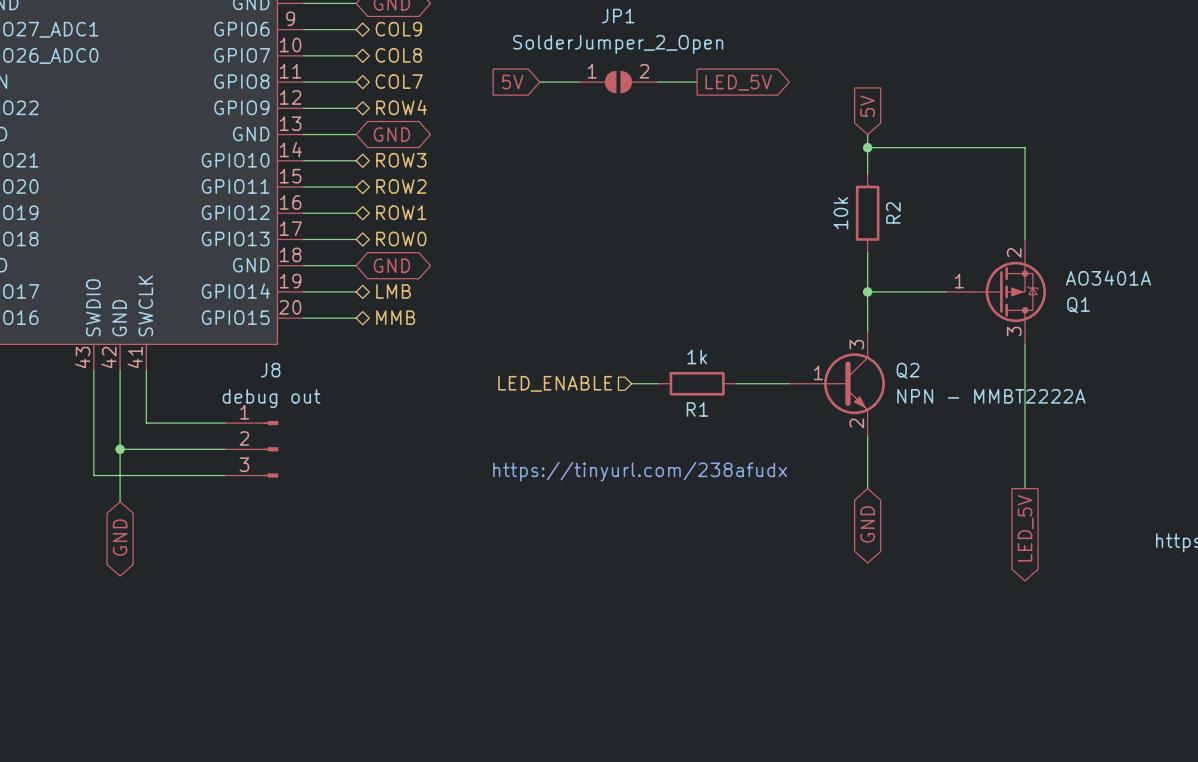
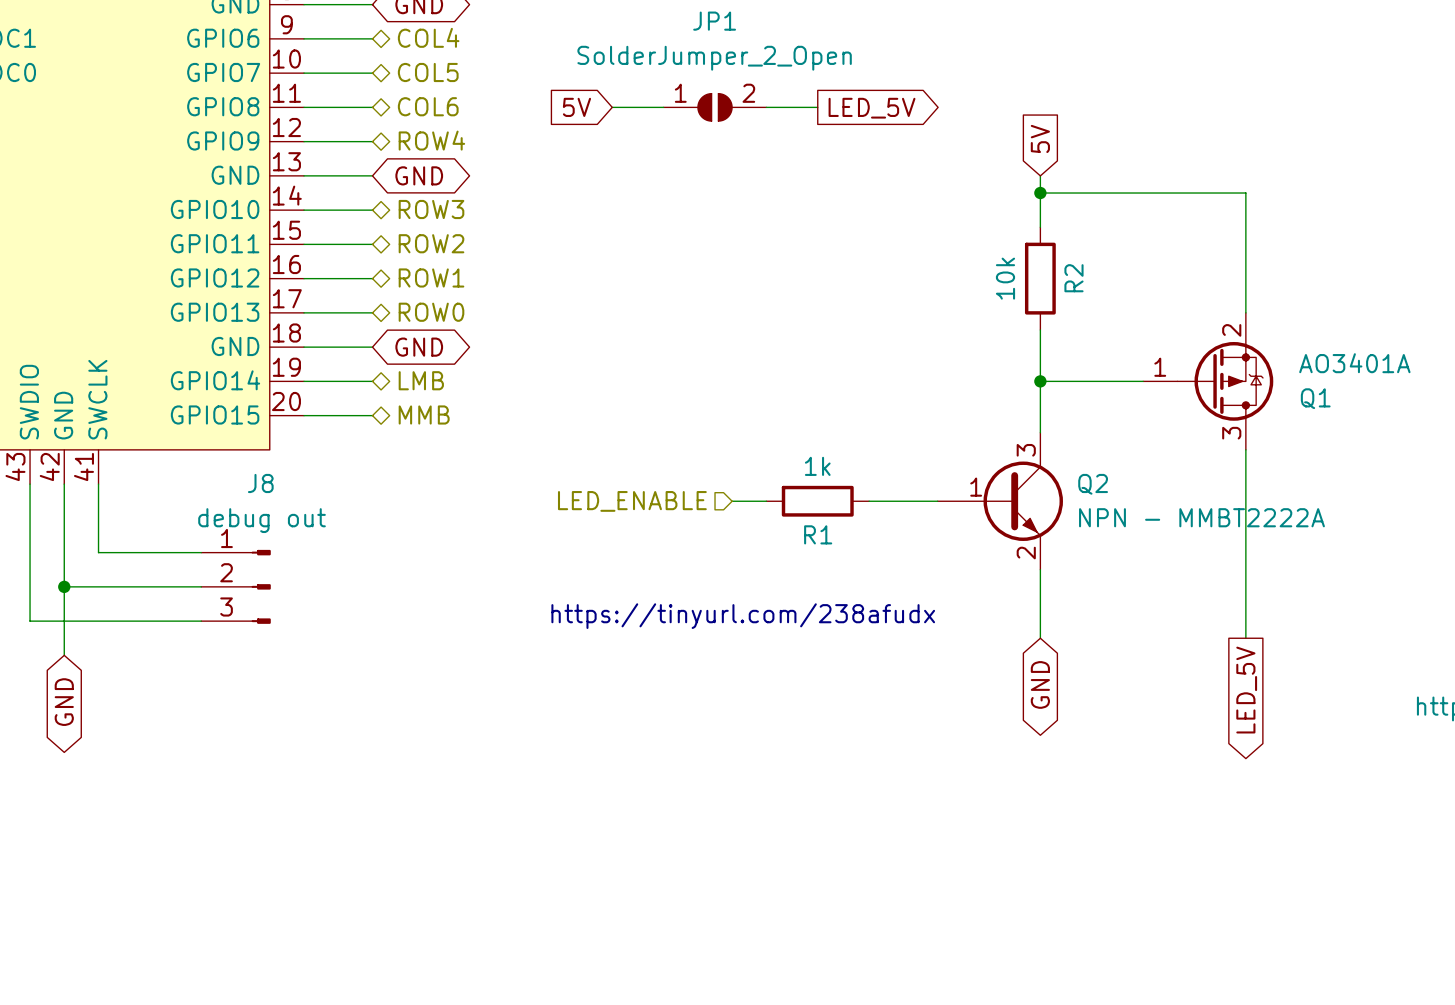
hierarchical label: COL9 (398, 29) -> COL4 (428, 37)
hierarchical label: COL8 (398, 55) -> COL5 (428, 72)
hierarchical label: COL7 (399, 81) -> COL6 (428, 106)

